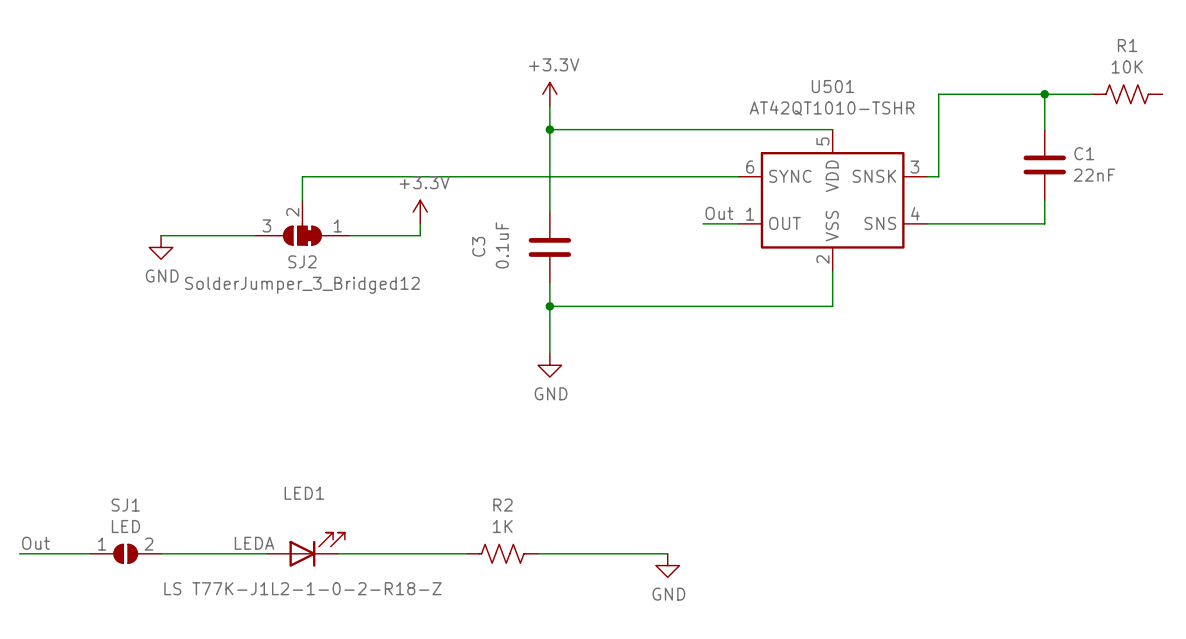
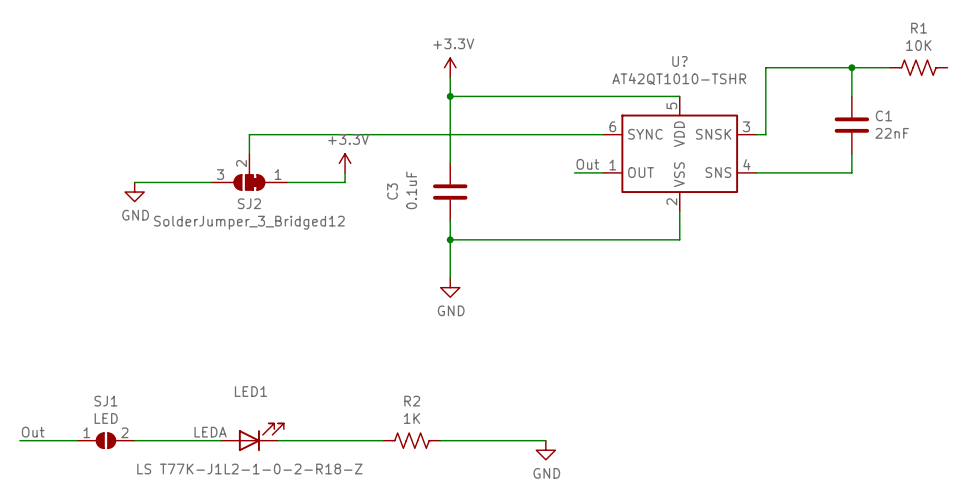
U501 name: U501 (832, 86) -> U? (679, 61)

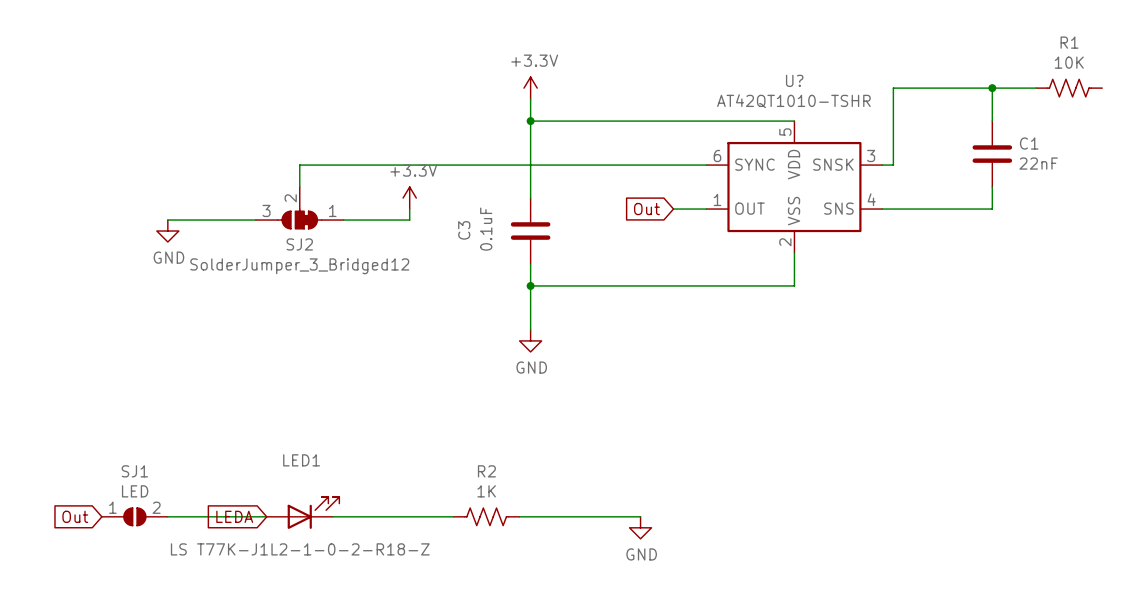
label: Out (587, 164) -> none
global label: none -> Out (646, 209)
label: Out (33, 432) -> none
label: LEDA (210, 432) -> none
wire: (19, 440) (77, 440) -> none
global label: none -> Out (75, 516)
global label: none -> LEDA (234, 516)

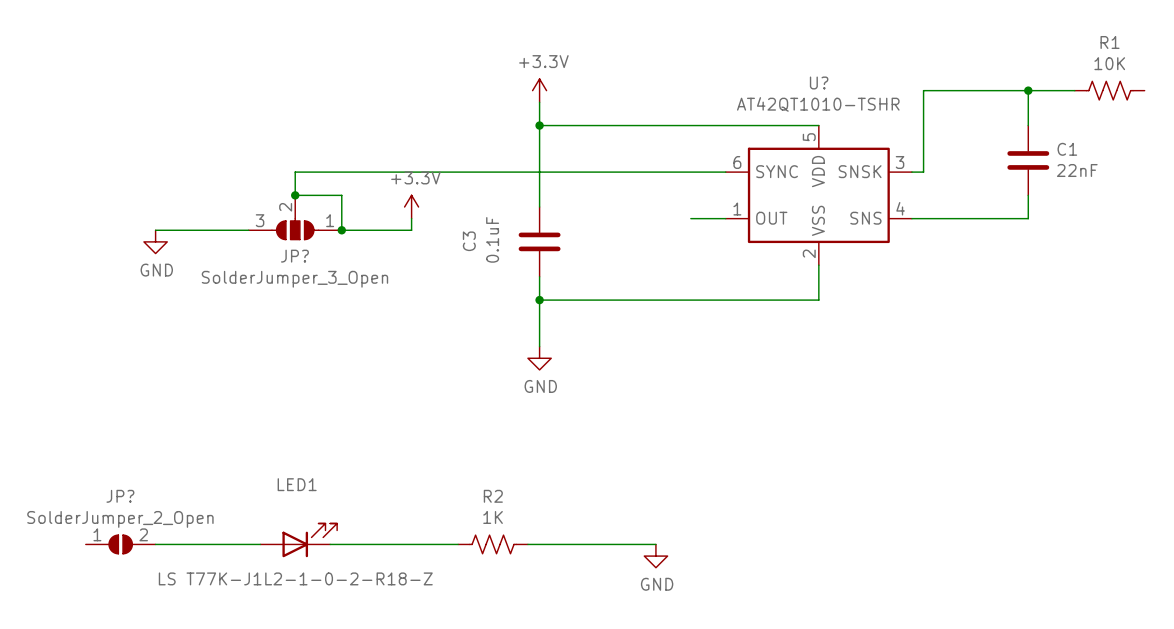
wire: none -> (295, 195) (341, 195) (341, 230)
junction: none -> (295, 195)
SJ2: SolderJumper_3_Bridged12 (299, 207) -> none
JP?: none -> SolderJumper_3_Open (295, 217)
global label: Out (646, 209) -> none
junction: none -> (341, 230)
SJ1 name: SJ1 (134, 471) -> JP? (120, 496)
SJ1 value: LED (135, 491) -> SolderJumper_2_Open (120, 519)
global label: Out (75, 516) -> none
global label: LEDA (234, 516) -> none

